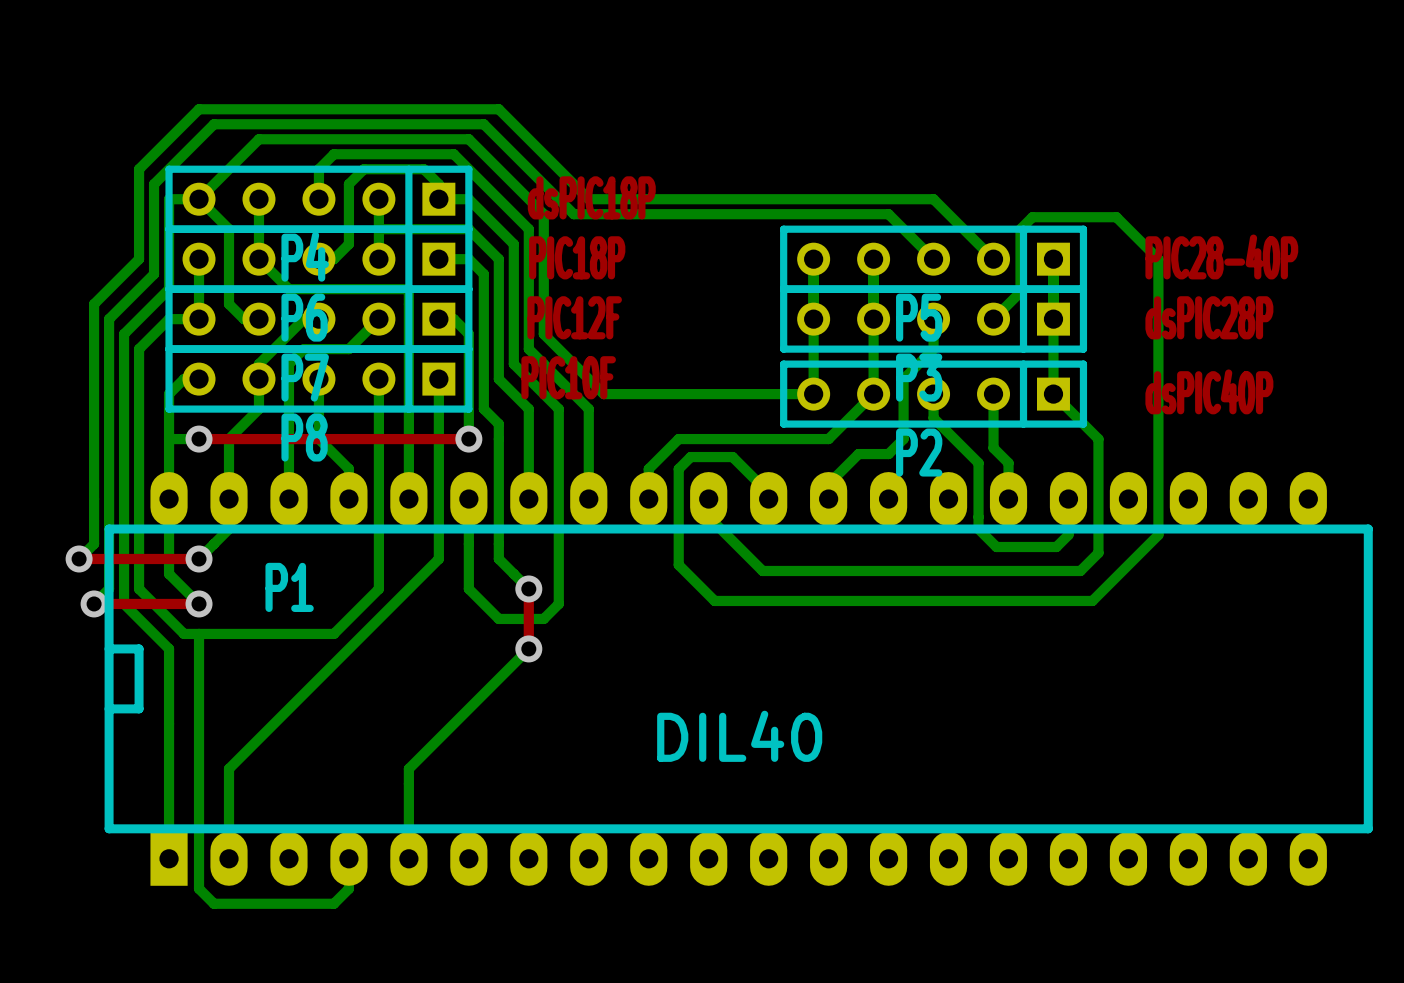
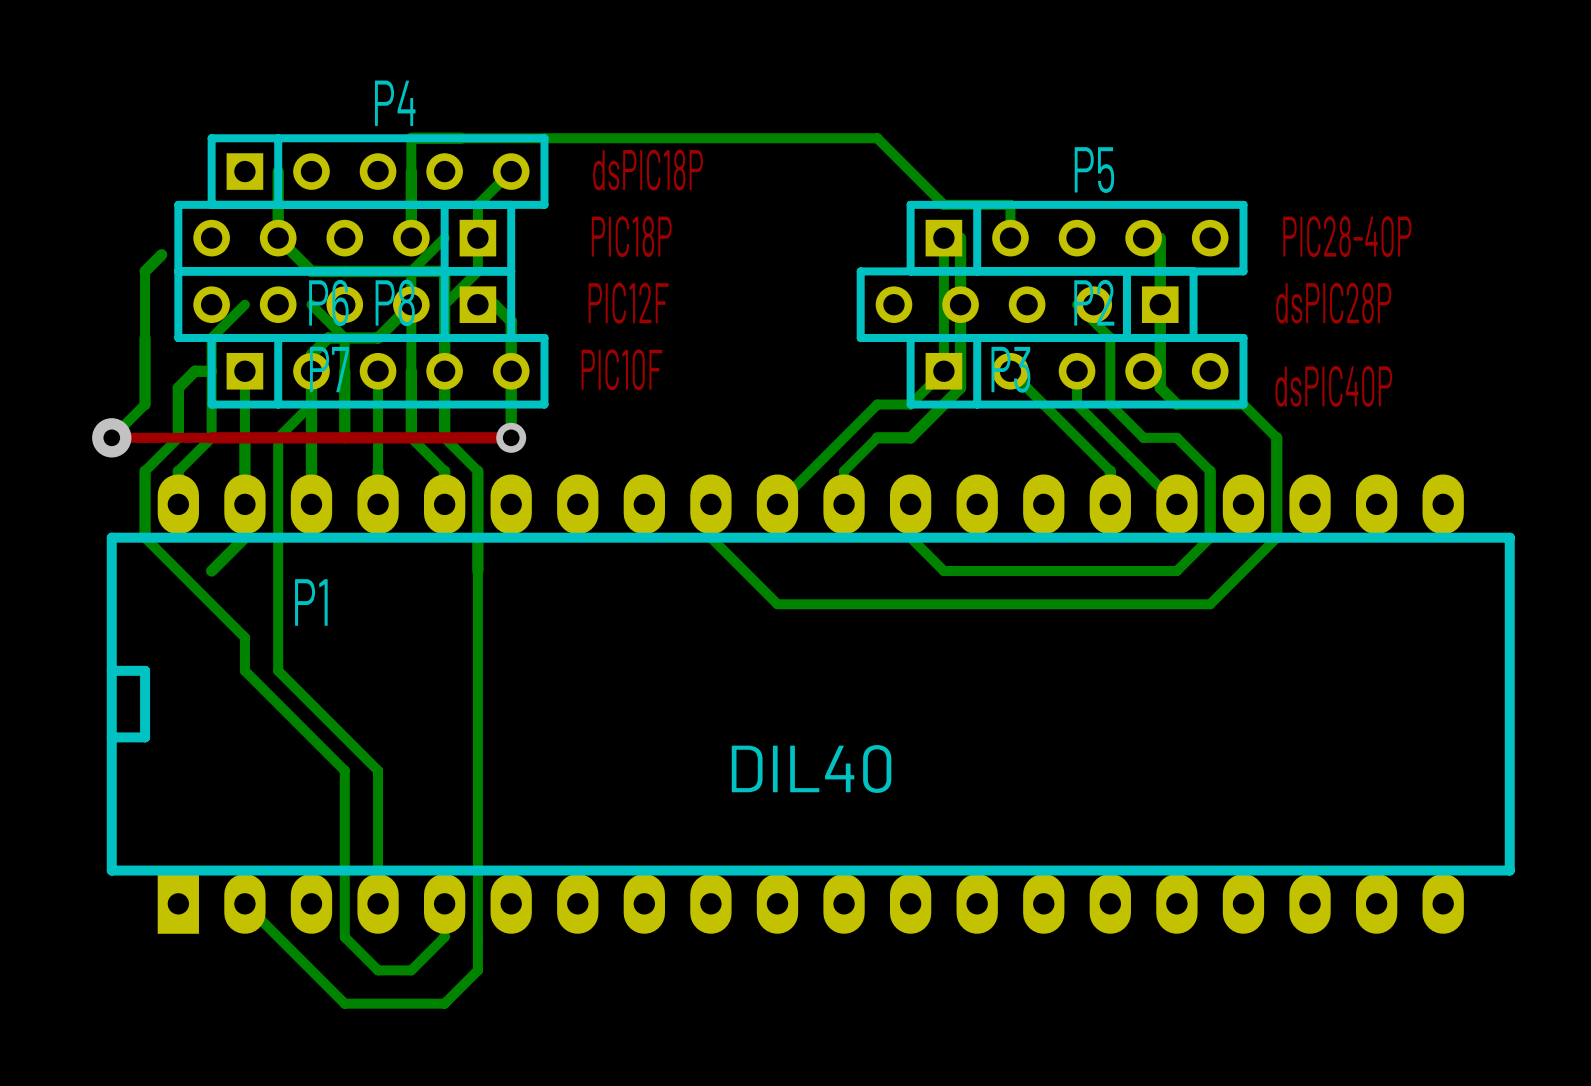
bottom track: (378, 169) (363, 169) (348, 184) (348, 244) (333, 259) (318, 259) -> (411, 138) (411, 171)
bottom track: (423, 169) (438, 184) (438, 199) (468, 199) (513, 244) (513, 364) (558, 409) (558, 603) (543, 618) (498, 618) (468, 588) (468, 499) -> (461, 138) (877, 138) (943, 204) (1010, 204) (1010, 238)
bottom track: (199, 199) (169, 199) (169, 289) (124, 334) (124, 603) (169, 648) (169, 858) -> none
bottom track: (199, 199) (258, 139) (468, 139) (543, 214) (543, 334) (603, 394) (813, 394) (813, 259) -> none
bottom track: (199, 199) (229, 229) (229, 304) (243, 319) (258, 319) -> none
bottom track: (318, 199) (318, 169) (333, 154) (453, 154) (528, 229) (528, 349) (588, 409) (588, 499) -> none
P4 rotation: 0° (318, 199) -> 180° (378, 171)
bottom track: none -> (511, 171) (477, 204) (477, 271) (444, 304)
bottom track: (378, 229) (468, 229) (498, 259) (498, 379) (528, 409) (528, 499) -> none
bottom track: (199, 259) (199, 319) (169, 319) (139, 349) -> (145, 271) (145, 337)
bottom track: none -> (444, 238) (411, 271) (411, 371)
bottom track: (438, 259) (468, 259) (483, 274) (483, 409) (498, 424) (498, 558) (528, 588) -> none
bottom track: none -> (943, 238) (943, 371) (910, 404) (877, 404) (777, 504)
bottom track: (933, 259) (888, 214) (573, 214) (483, 124) (214, 124) (154, 184) (154, 274) -> none
P5 rotation: 0° (933, 259) -> 180° (1077, 238)
bottom track: (993, 259) (933, 199) (588, 199) (498, 109) (199, 109) (139, 169) (139, 259) (94, 304) (94, 544) (79, 558) -> none
bottom track: (139, 289) (109, 319) (109, 588) (94, 603) -> none
bottom track: none -> (311, 304) (344, 337) (344, 371)
bottom track: (318, 319) (303, 319) (258, 364) (258, 409) (229, 439) -> (244, 371) (244, 437)
bottom track: (933, 319) (933, 349) (903, 379) (903, 439) (888, 454) (858, 454) (828, 484) (828, 499) -> none
bottom track: none -> (1077, 304) (1110, 337) (1110, 404) (1143, 437) (1176, 437) (1210, 471)
bottom track: (993, 319) (1020, 292) (1020, 229) (1032, 217) (1116, 217) (1158, 259) (1158, 439) -> none
P8 rotation: 0° (318, 379) -> 180° (378, 371)
bottom track: (438, 379) (438, 469) -> (444, 437) (477, 471)
bottom track: (933, 394) (933, 418) (978, 463) (978, 529) (996, 547) (1056, 547) (1068, 535) (1068, 499) -> (1077, 371) (1077, 404) (1176, 504)
P2 rotation: 0° (933, 394) -> 180° (1077, 371)
bottom track: (993, 394) (993, 448) (1008, 463) (1008, 469) -> (1010, 371) (1110, 471)
bottom track: (139, 409) (139, 469) -> (145, 404) (111, 437)
bottom track: (1068, 409) (1098, 439) (1098, 469) -> (1176, 404) (1243, 404) (1276, 437)
top track: none -> (111, 437) (211, 437)
via: none -> (111, 437)
bottom track: none -> (178, 437) (145, 471)
bottom track: (199, 439) (169, 439) (169, 469) -> (244, 304) (211, 337) (211, 437) (178, 471)
via: (199, 439) -> none
bottom track: (318, 439) (348, 469) -> (378, 371) (378, 471)
bottom track: (378, 439) (378, 588) (333, 633) (184, 633) (139, 588) (139, 529) -> none
bottom track: (408, 439) (408, 469) -> (411, 437) (444, 471)
bottom track: (798, 439) (678, 439) (648, 469) (648, 499) -> (877, 437) (844, 471) (844, 497)
bottom track: (768, 493) (732, 457) (690, 457) (678, 469) (678, 564) (714, 600) (1092, 600) (1158, 535) (1158, 529) -> (710, 504) (710, 537) (777, 604) (1210, 604) (1276, 537)
bottom track: (169, 499) (169, 573) (199, 603) -> none
bottom track: (708, 499) (708, 517) (762, 570) (1080, 570) (1098, 552) (1098, 529) -> (910, 504) (910, 537) (943, 570) (1176, 570) (1210, 537)
top track: (79, 558) (199, 558) -> none
via: (79, 558) -> none
via: (199, 558) -> none
bottom track: (438, 558) (229, 768) (229, 858) -> (477, 570) (477, 970) (444, 1003) (344, 1003) (244, 903)
top track: (528, 588) (528, 648) -> none
via: (528, 588) -> none
top track: (94, 603) (199, 603) -> none
via: (94, 603) -> none
via: (199, 603) -> none
bottom track: (199, 633) (199, 888) (214, 903) (333, 903) (348, 888) (348, 858) -> (311, 404) (278, 437) (278, 670) (378, 770) (378, 903)
bottom track: (528, 648) (408, 768) (408, 858) -> (145, 537) (244, 637) (244, 670) (344, 770) (344, 937) (378, 970) (411, 970) (444, 937) (444, 903)
via: (528, 648) -> none

